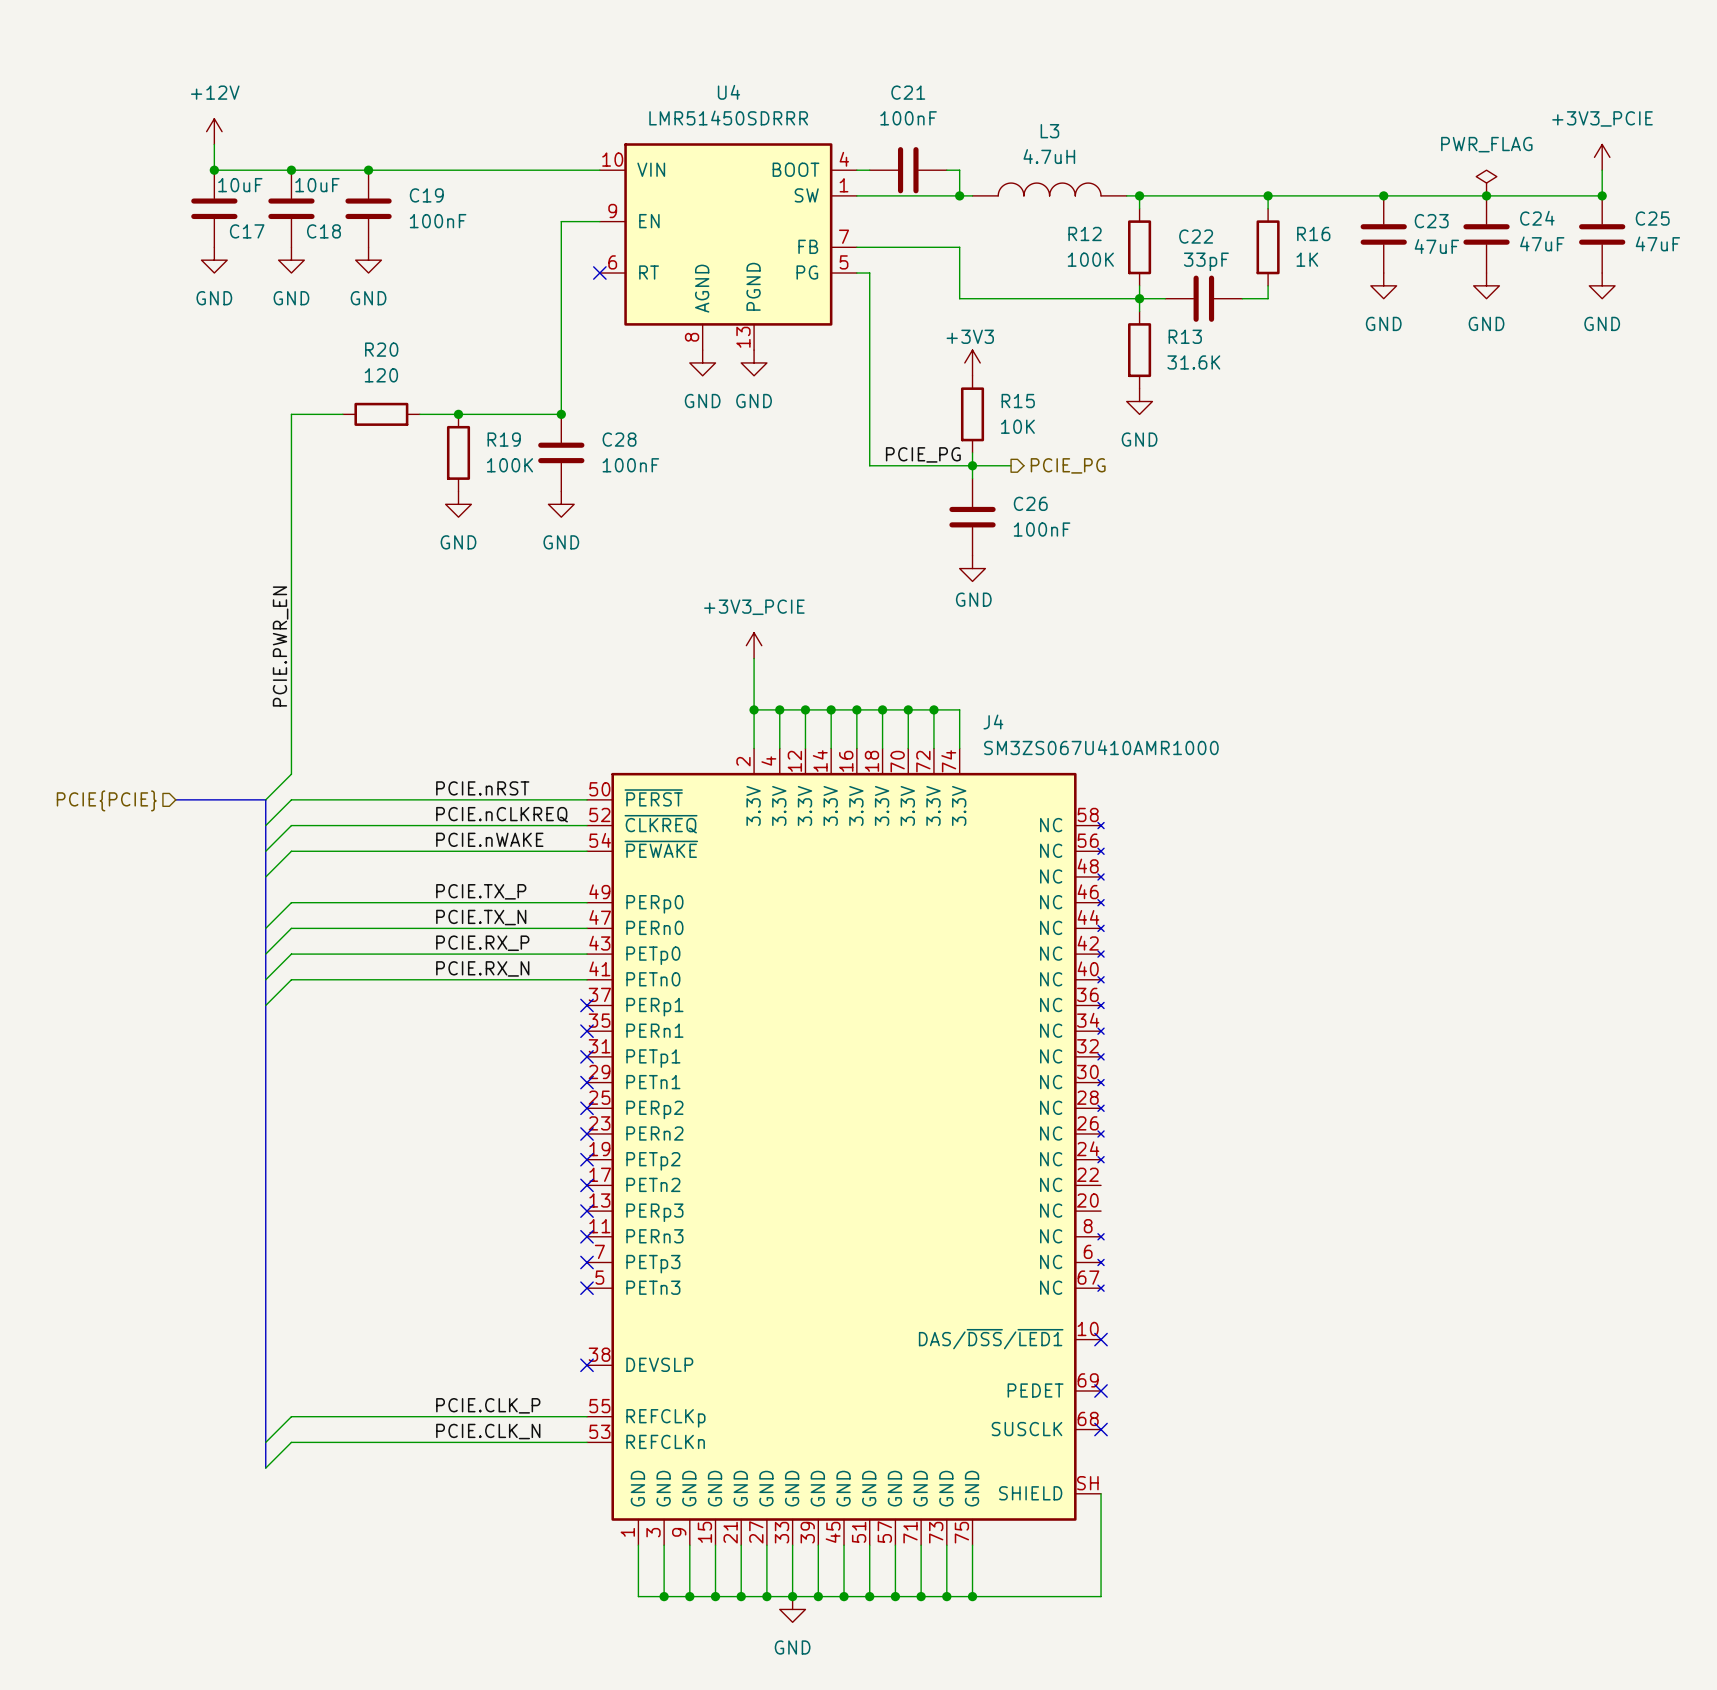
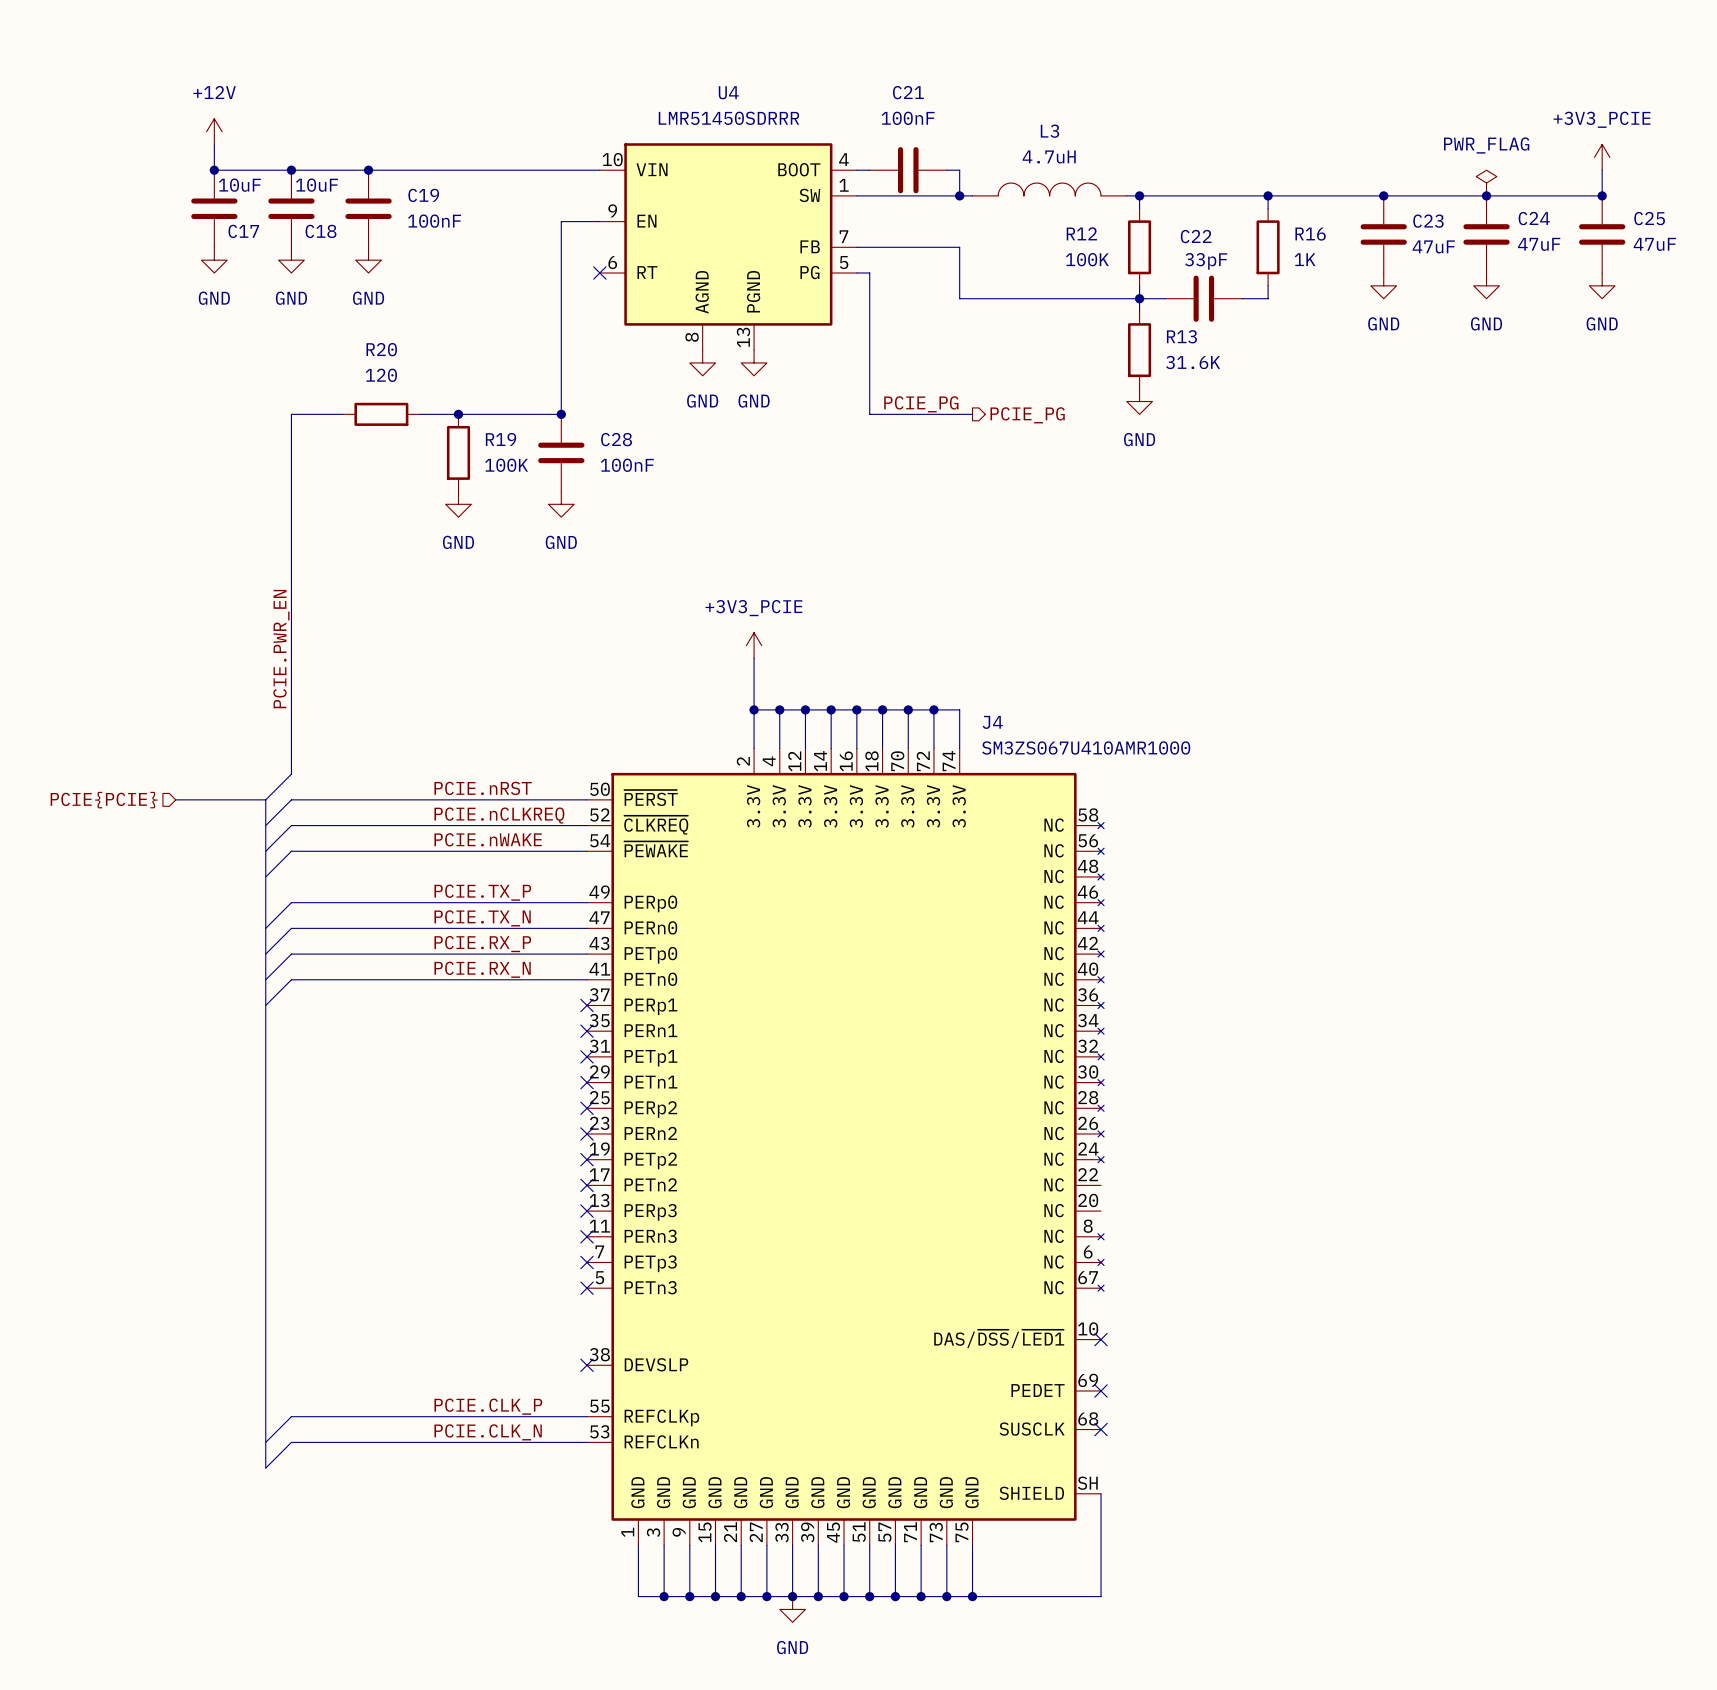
power symbol: +3V3 (972, 362) -> none
wire: (869, 414) (869, 465) (1011, 465) -> (869, 414) (972, 414)
R15: 10K (972, 414) -> none
wire: (972, 452) (972, 478) -> none
label position: PCIE_PG (923, 454) -> PCIE_PG (921, 404)
junction: (972, 465) -> none
hierarchical label position: PCIE_PG (1068, 465) -> PCIE_PG (1027, 415)
C26: 100nF (972, 517) -> none
power symbol: GND (972, 568) -> none

